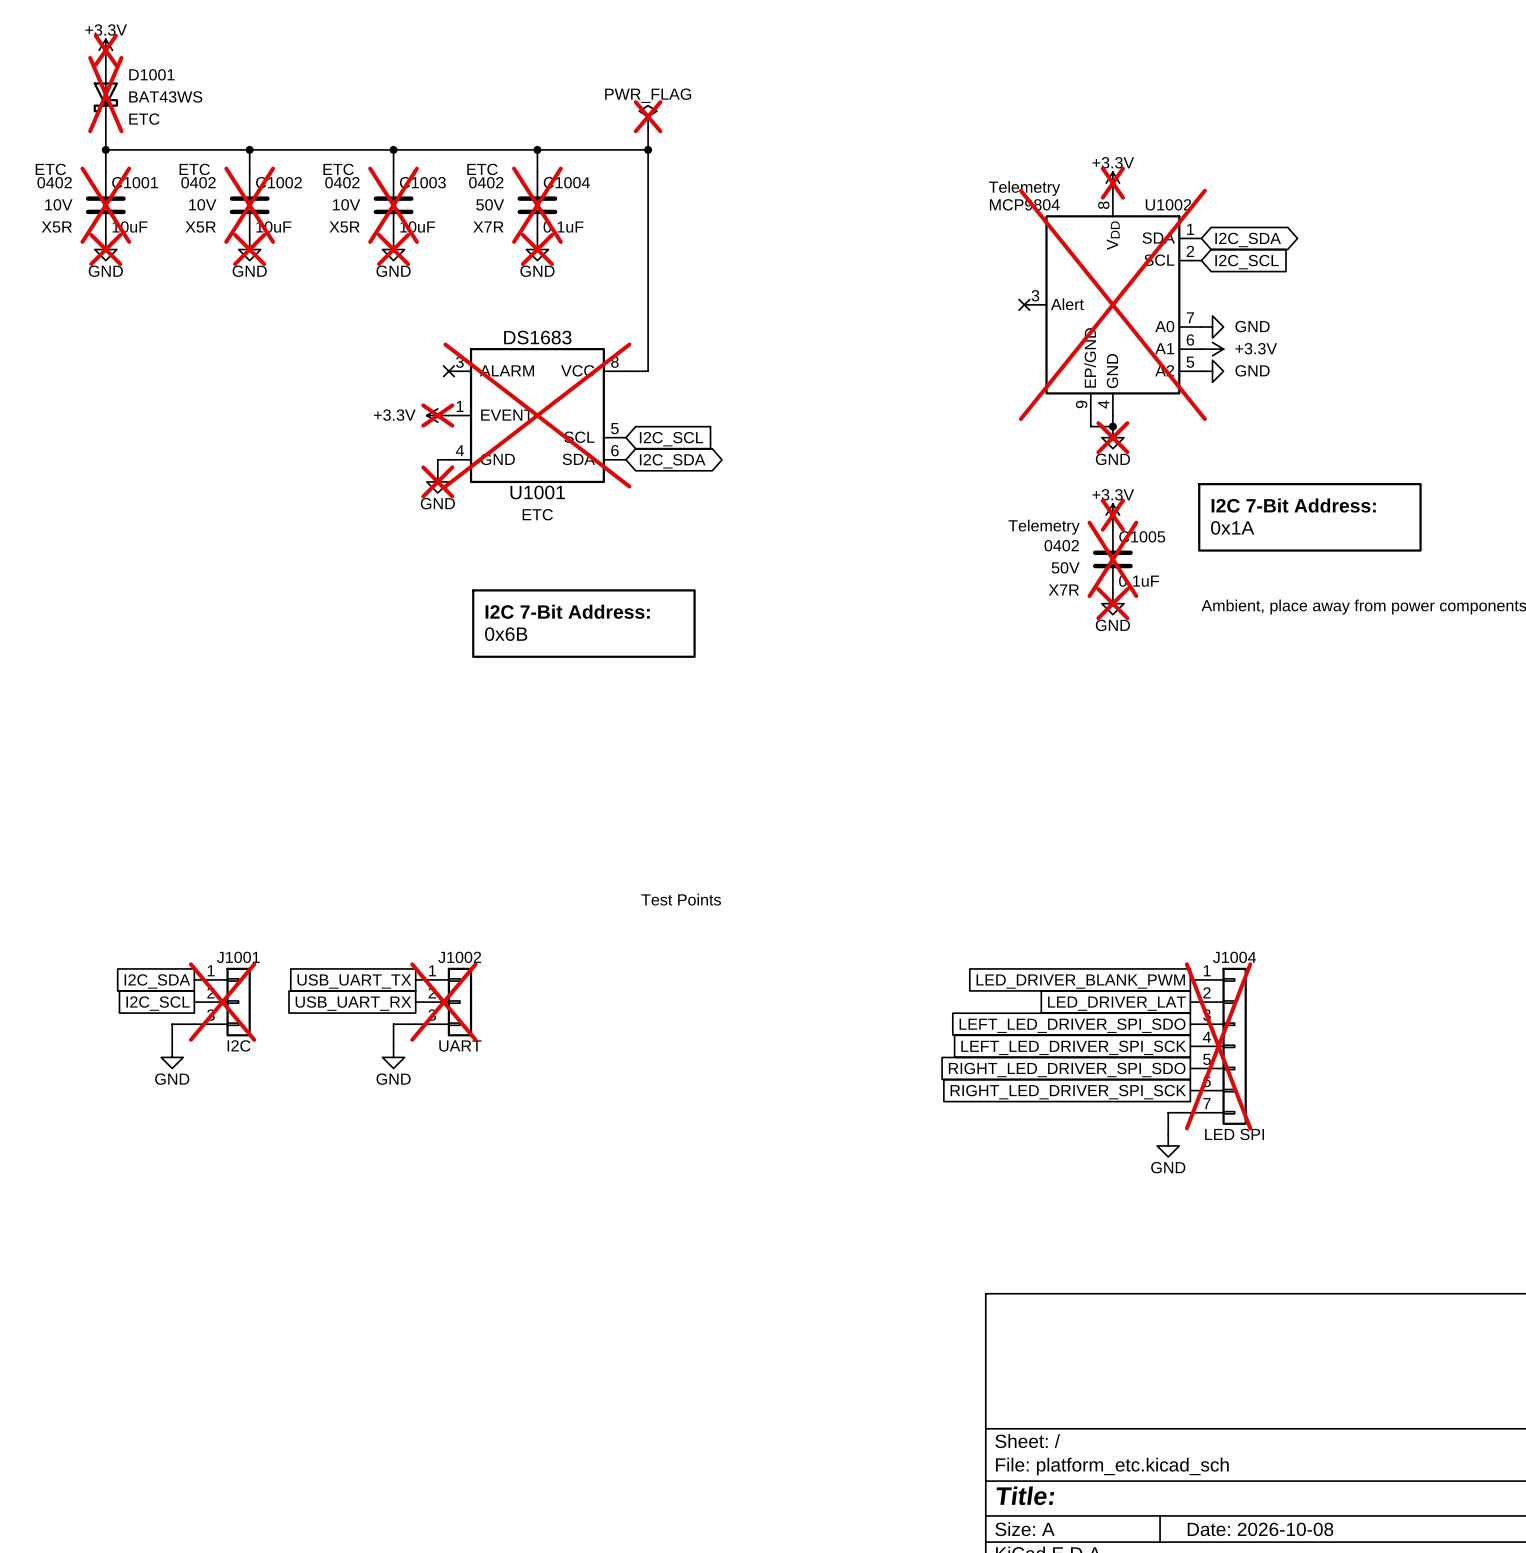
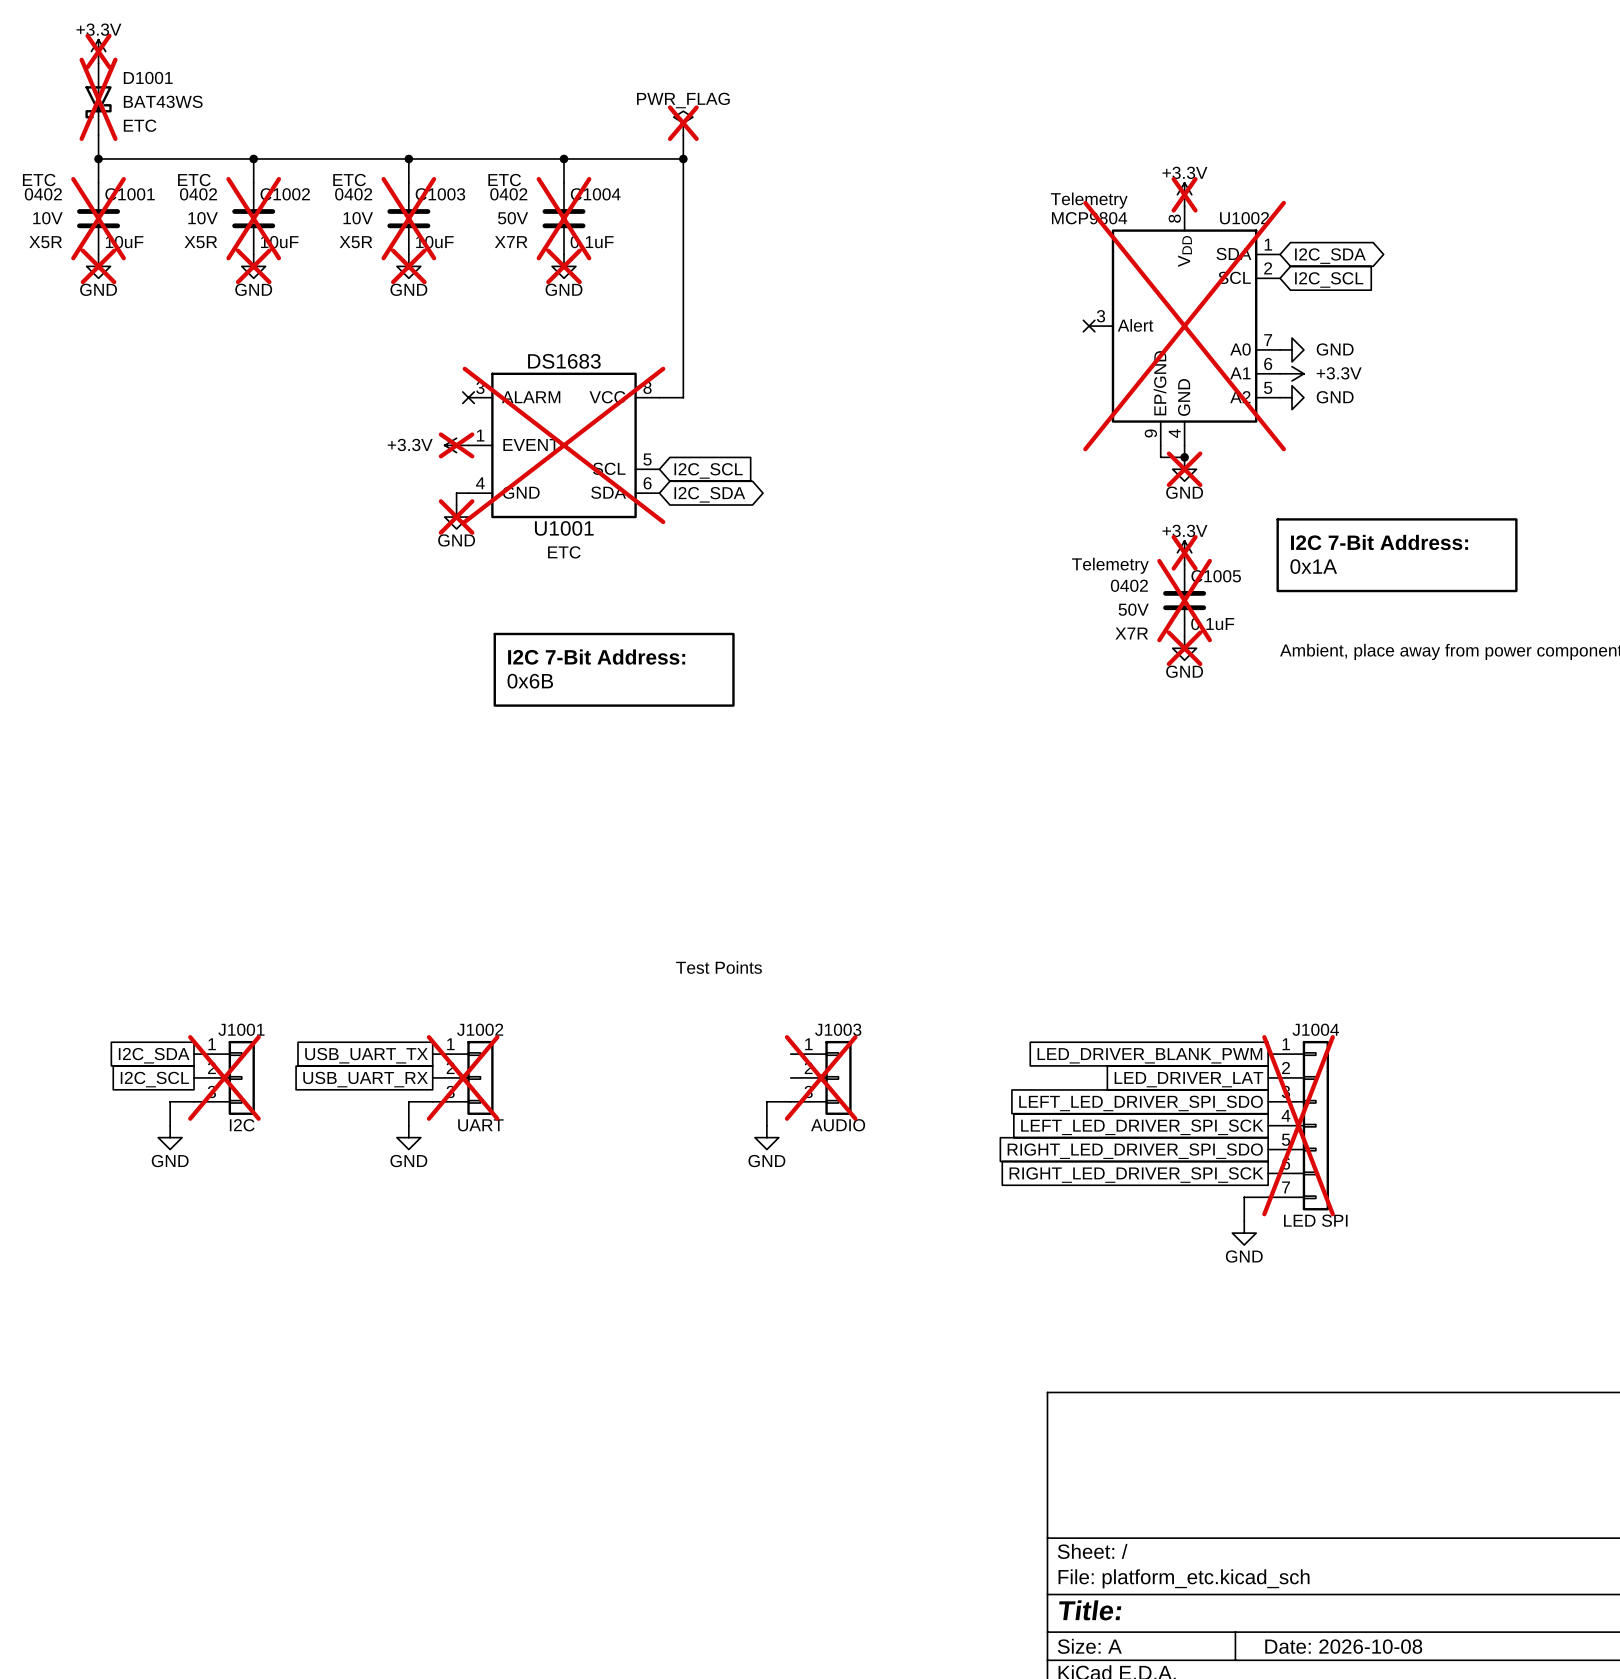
J1003: none -> AUDIO (821, 1077)
wire: none -> (790, 1101) (766, 1101) (766, 1125)
power symbol: none -> GND (766, 1137)

